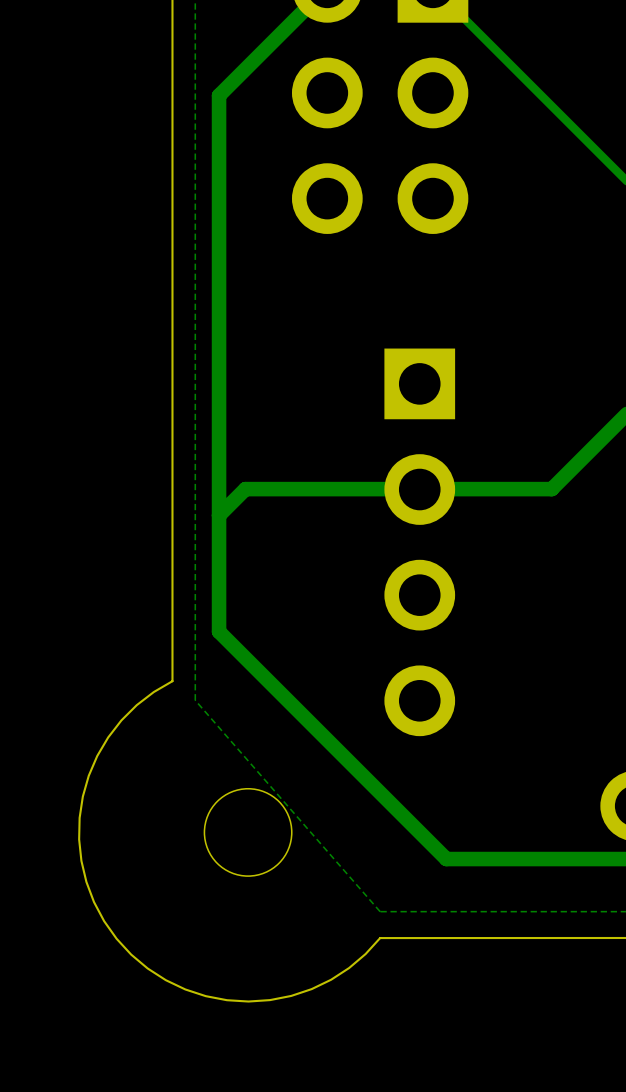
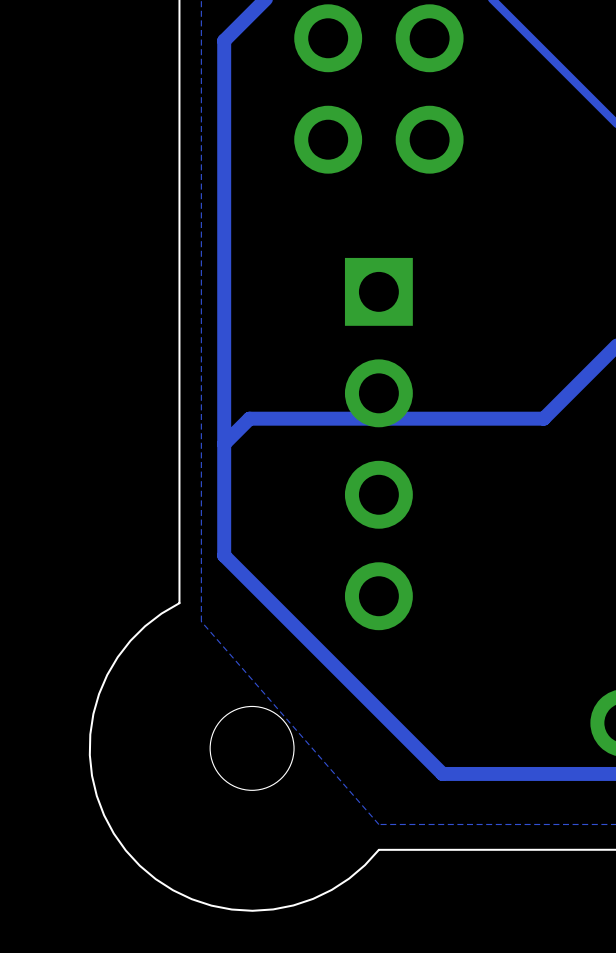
part position: (419, 542) -> (378, 444)

